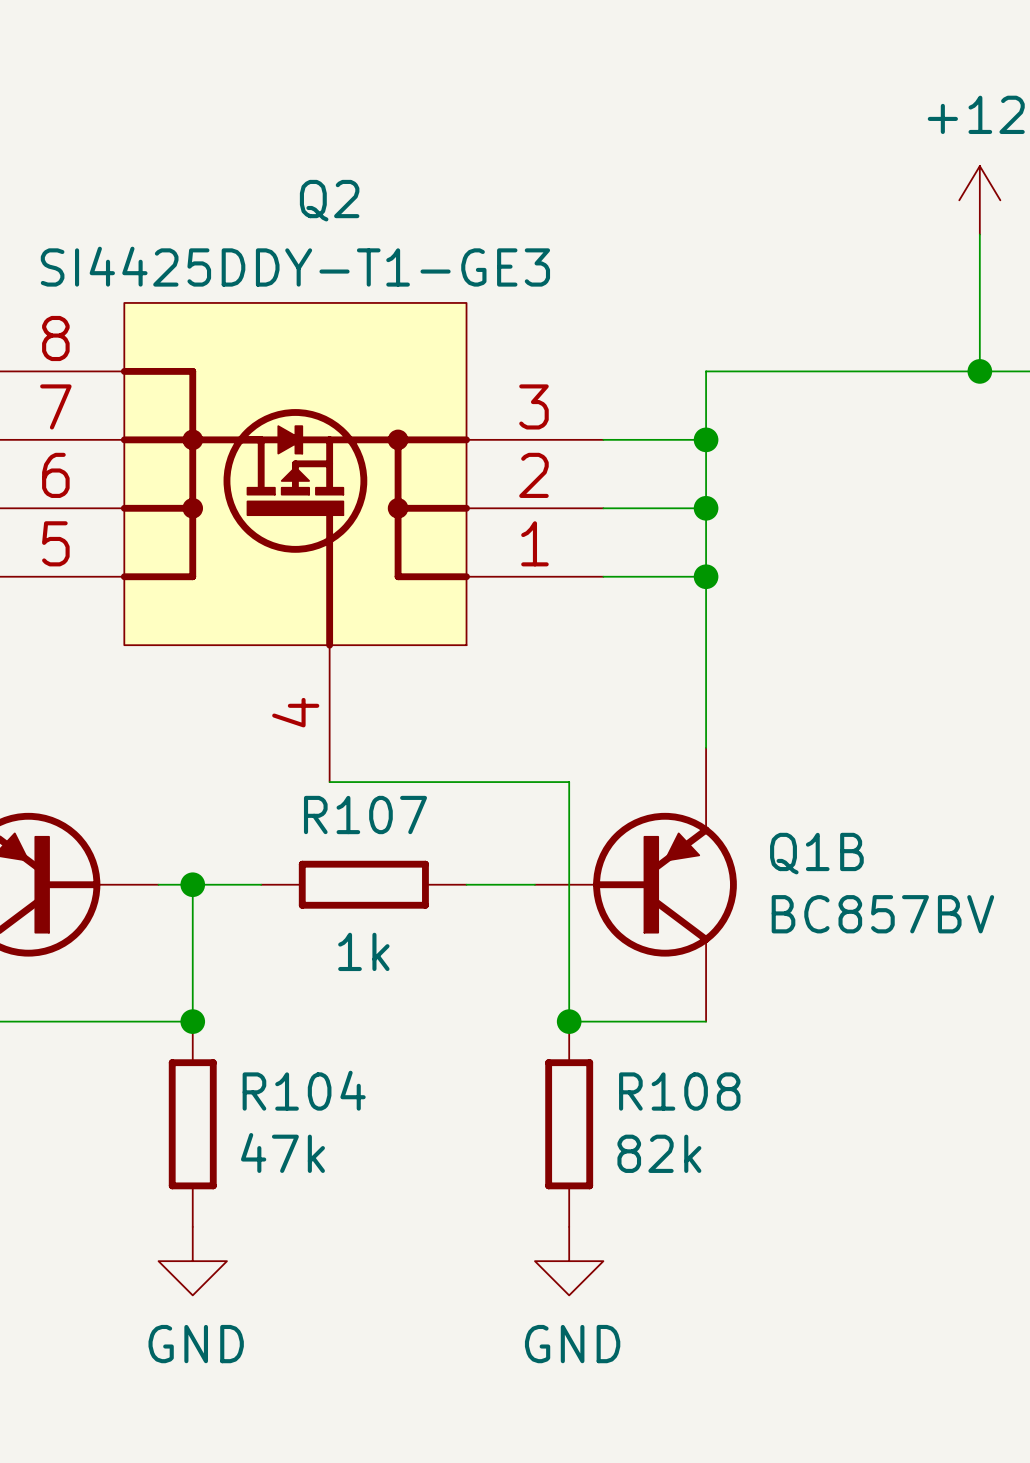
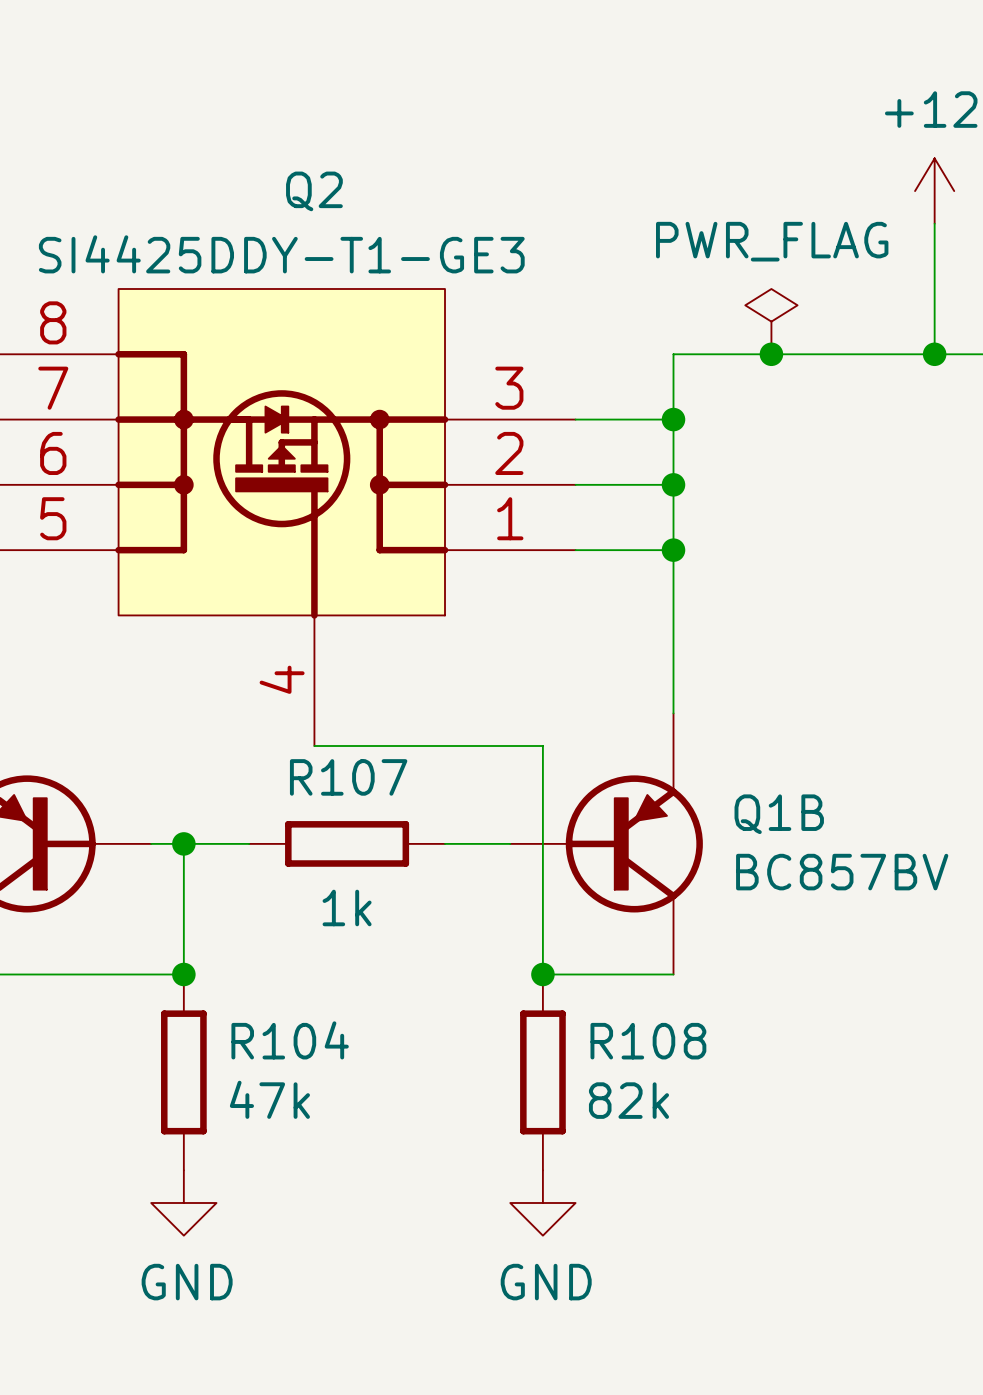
power symbol: none -> PWR_FLAG (771, 321)
junction: none -> (771, 354)

